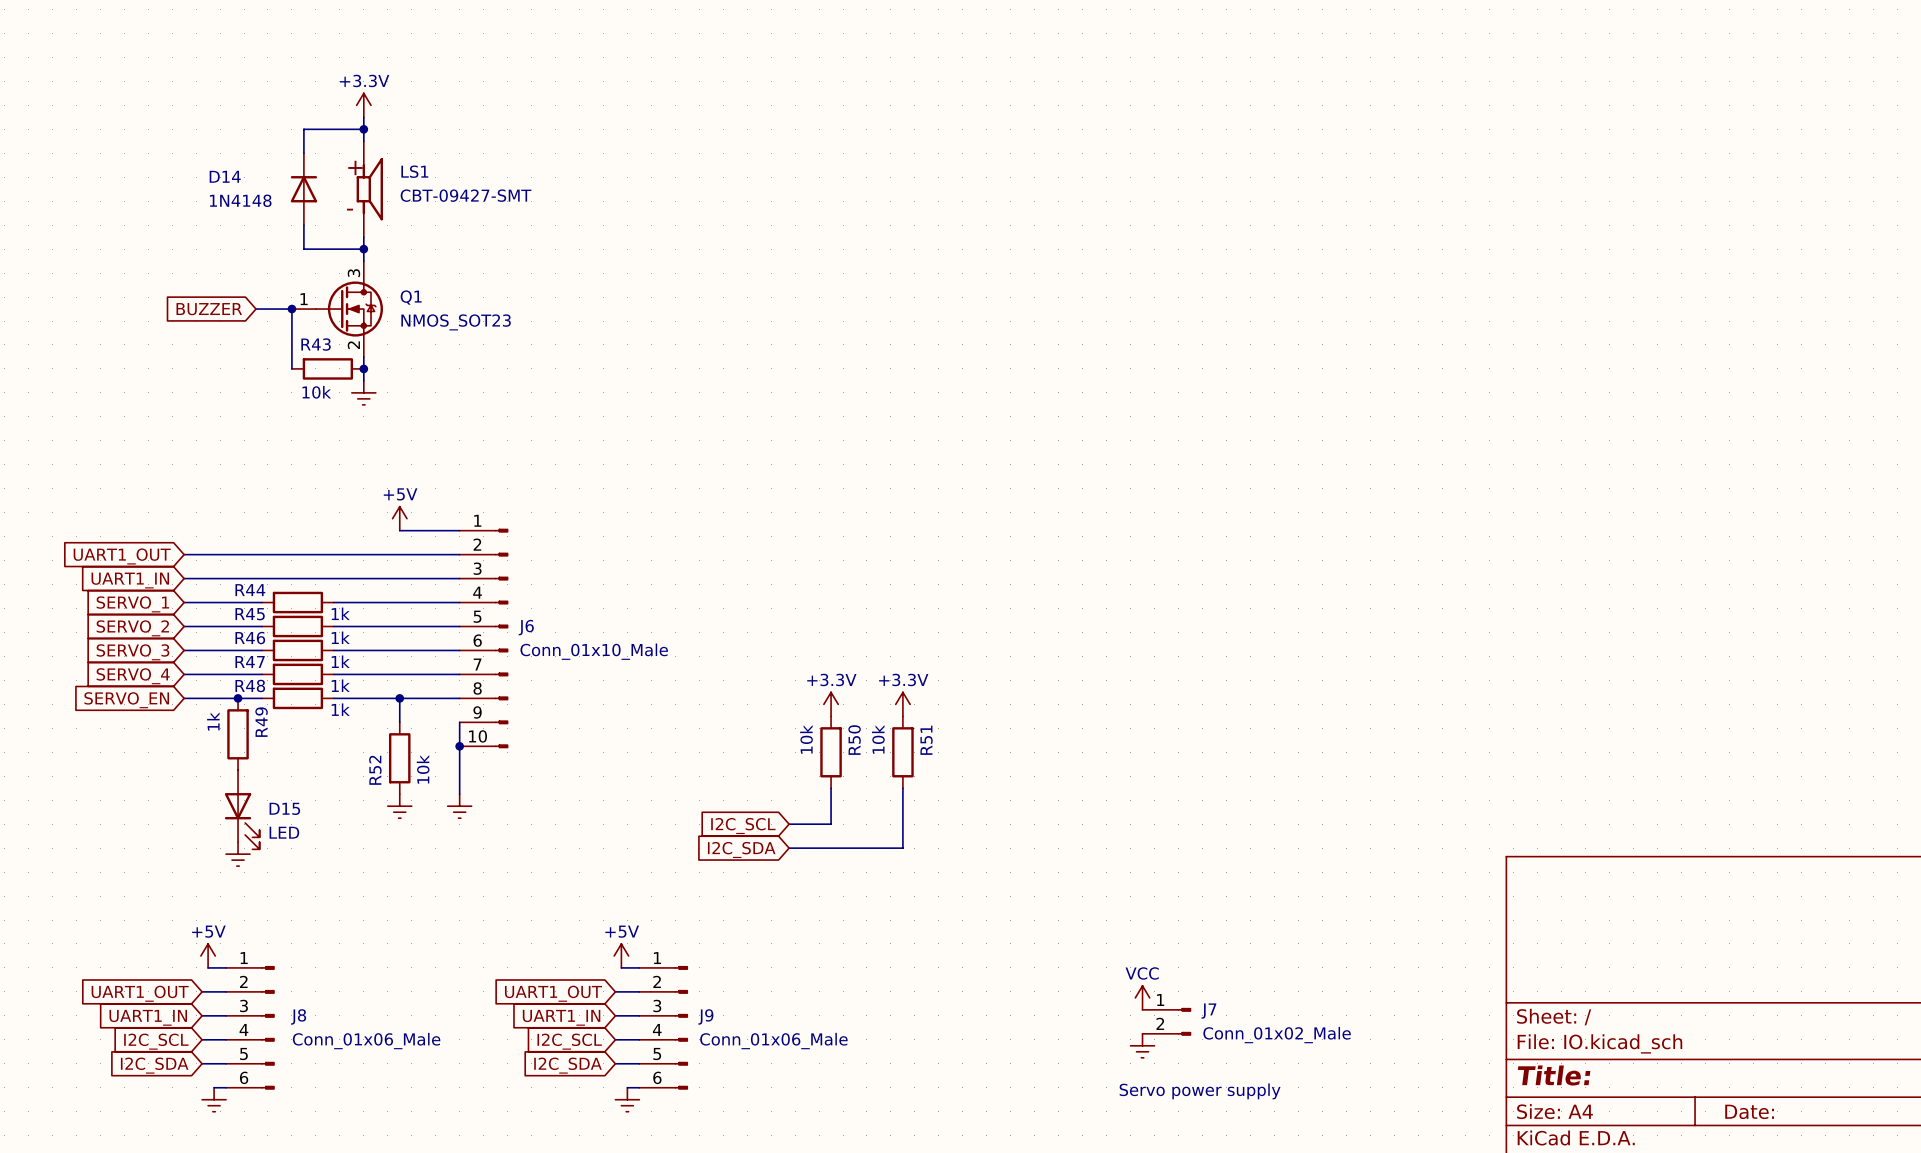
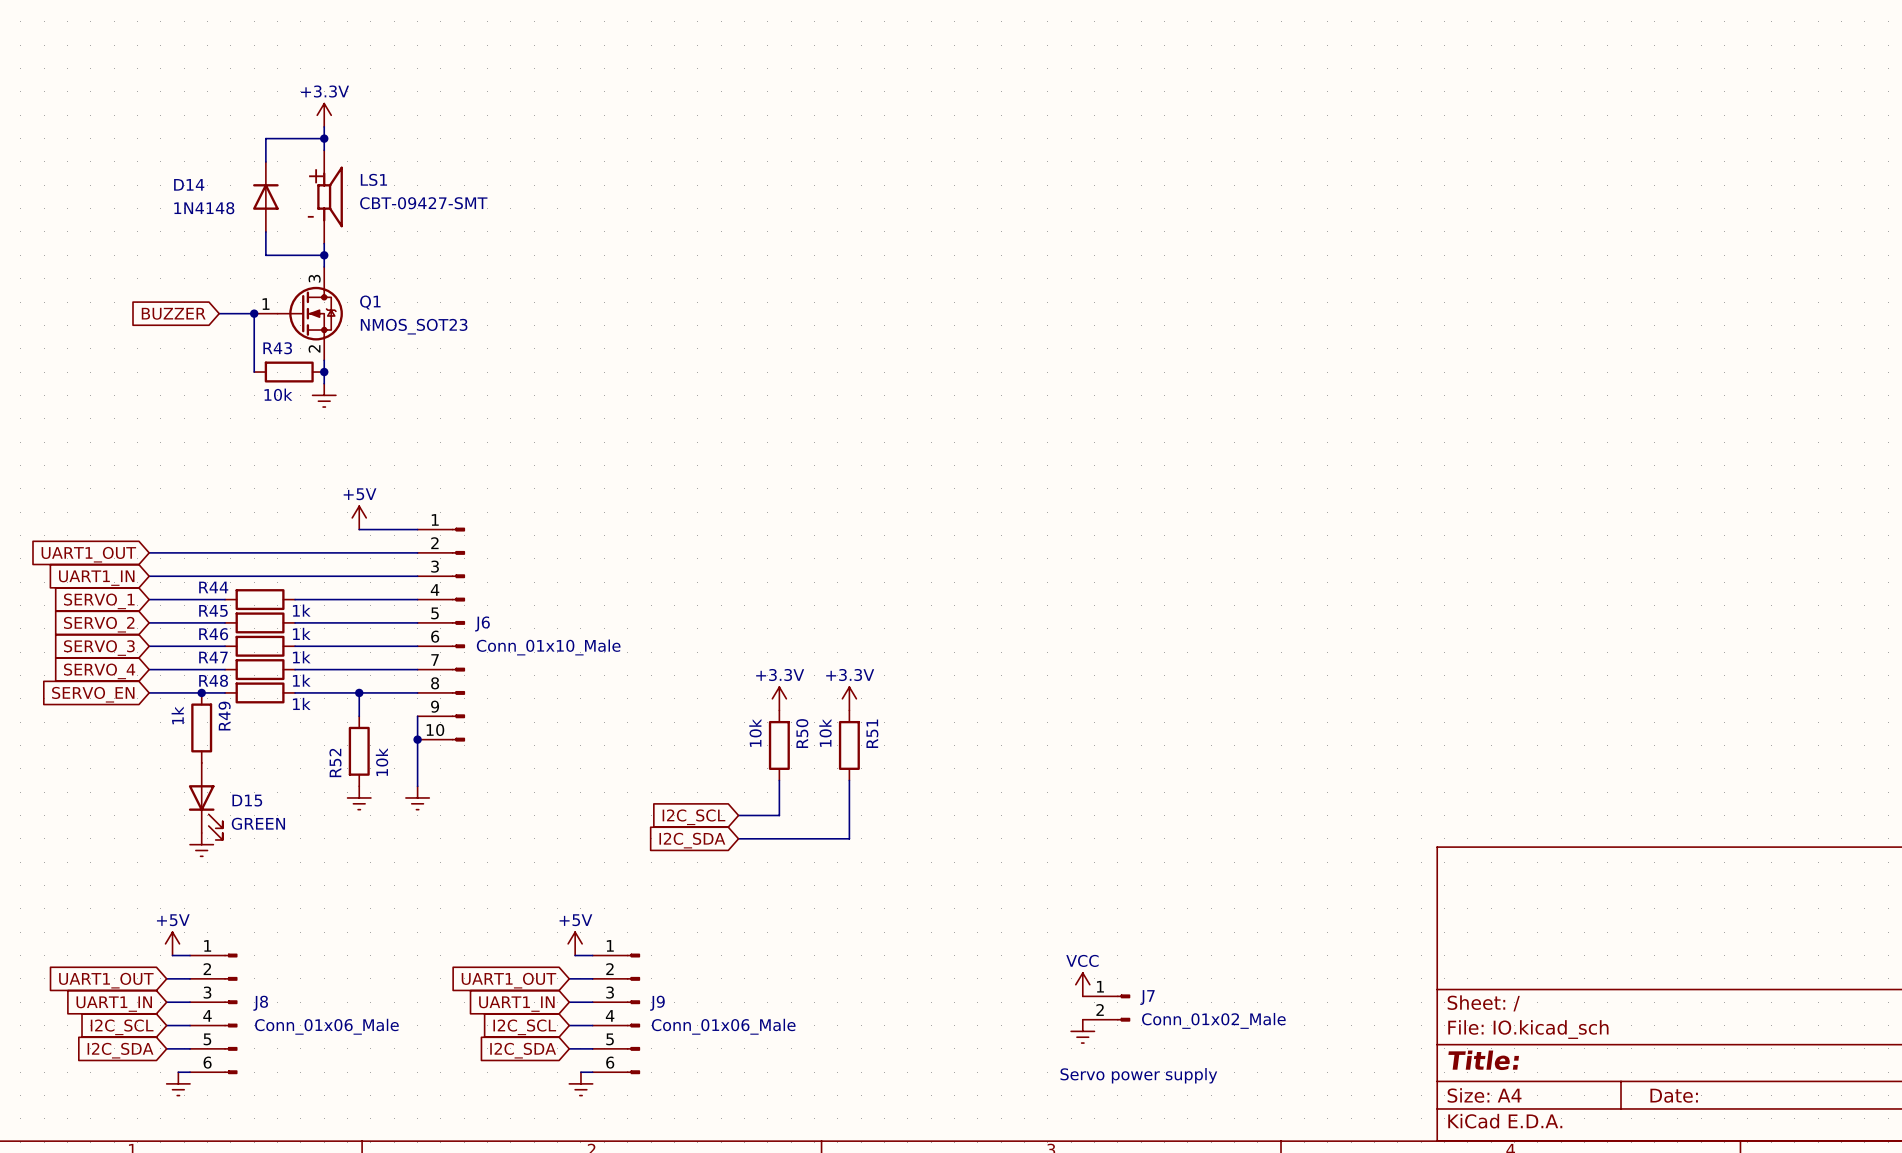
D15 value: LED (284, 832) -> GREEN (258, 823)

